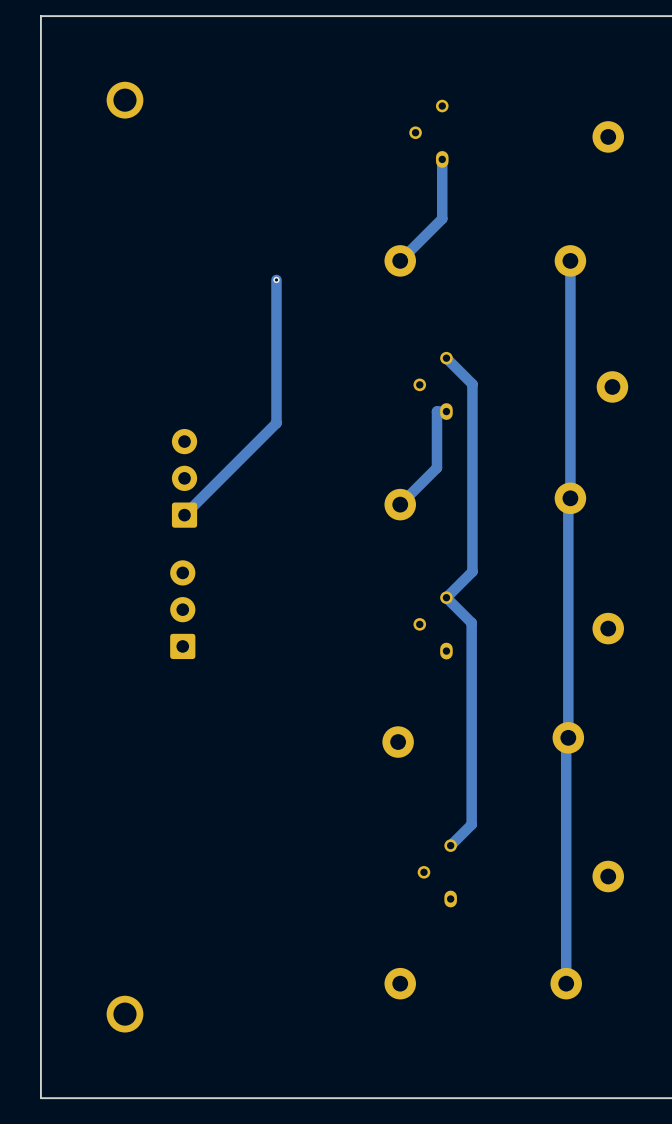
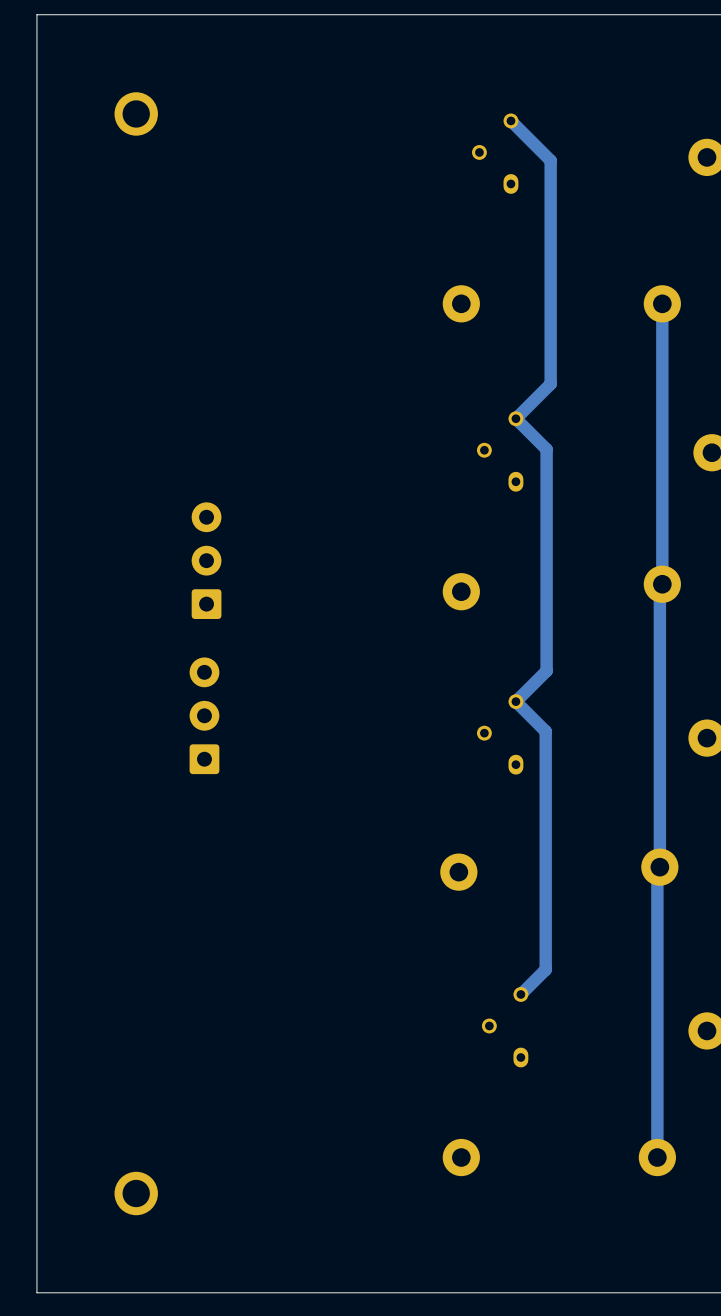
track: none -> (510, 120) (550, 160) (550, 383) (515, 418)
track: (442, 159) (442, 218) (400, 260) -> none
track: (276, 279) (276, 423) (184, 515) -> none
via: (276, 279) -> none
track: (446, 411) (436, 411) (436, 467) (400, 504) -> none

